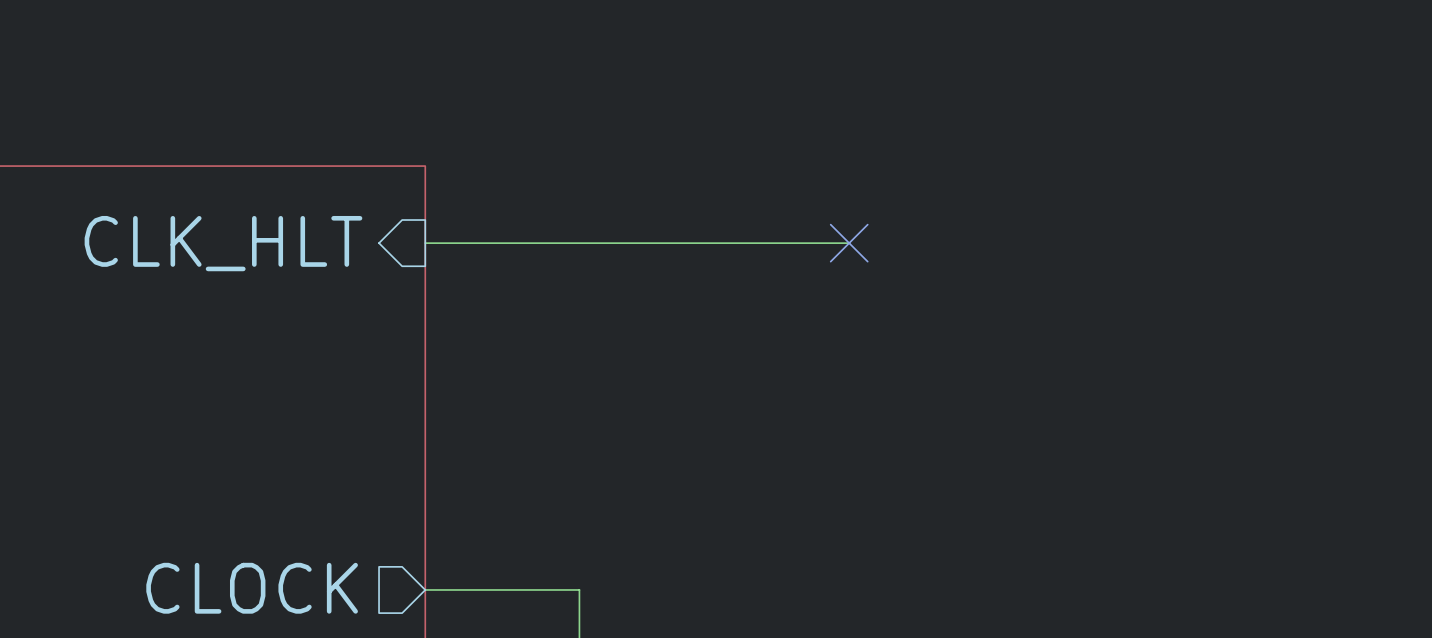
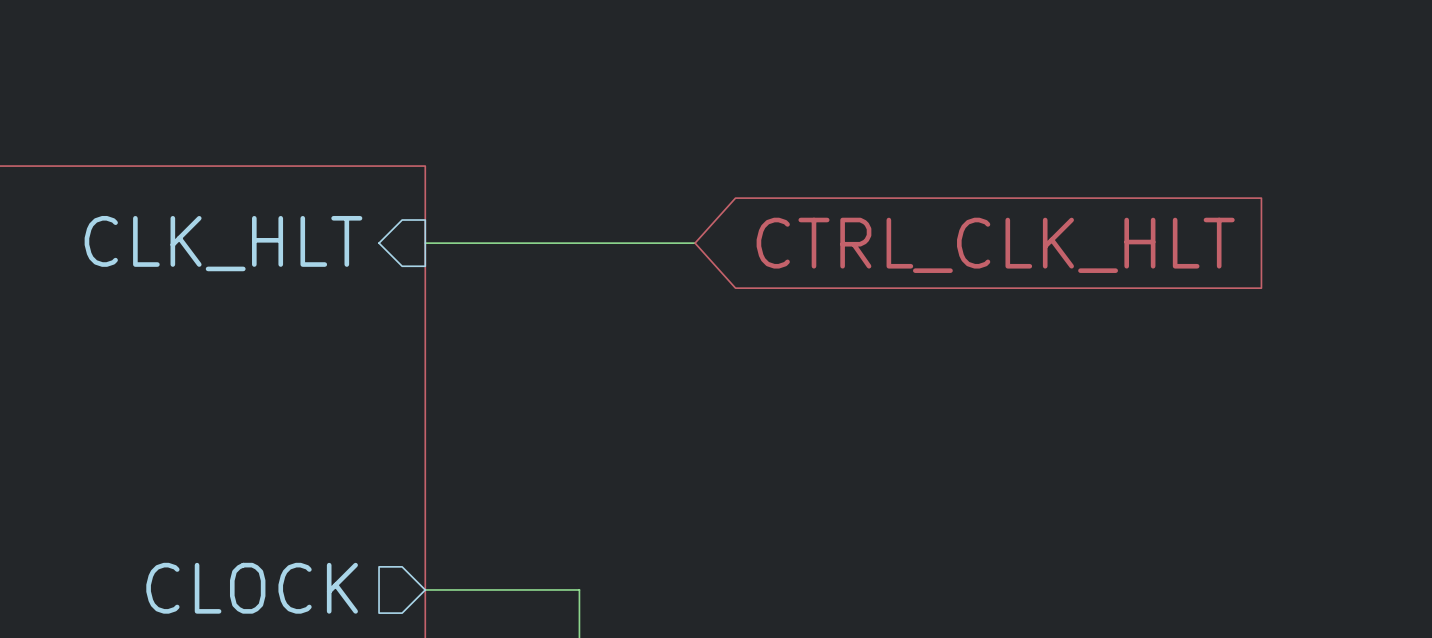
wire: (695, 243) (849, 243) -> none
no-connect mark: (849, 243) -> none
global label: none -> CTRL_CLK_HLT (995, 245)

